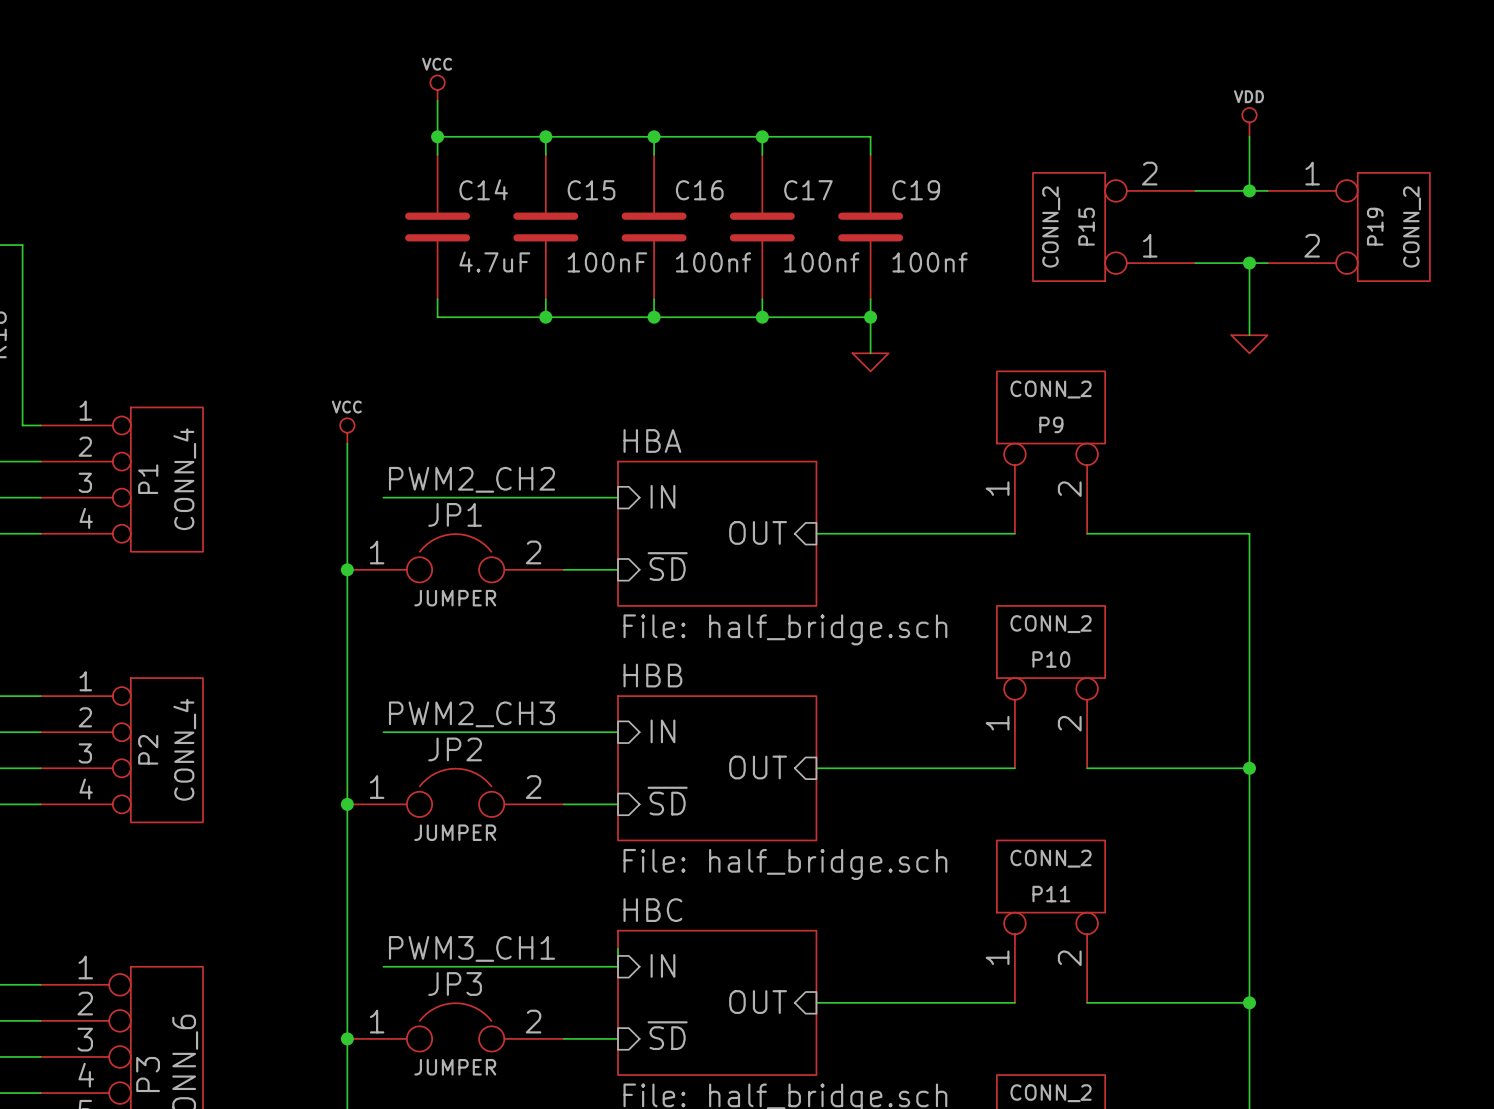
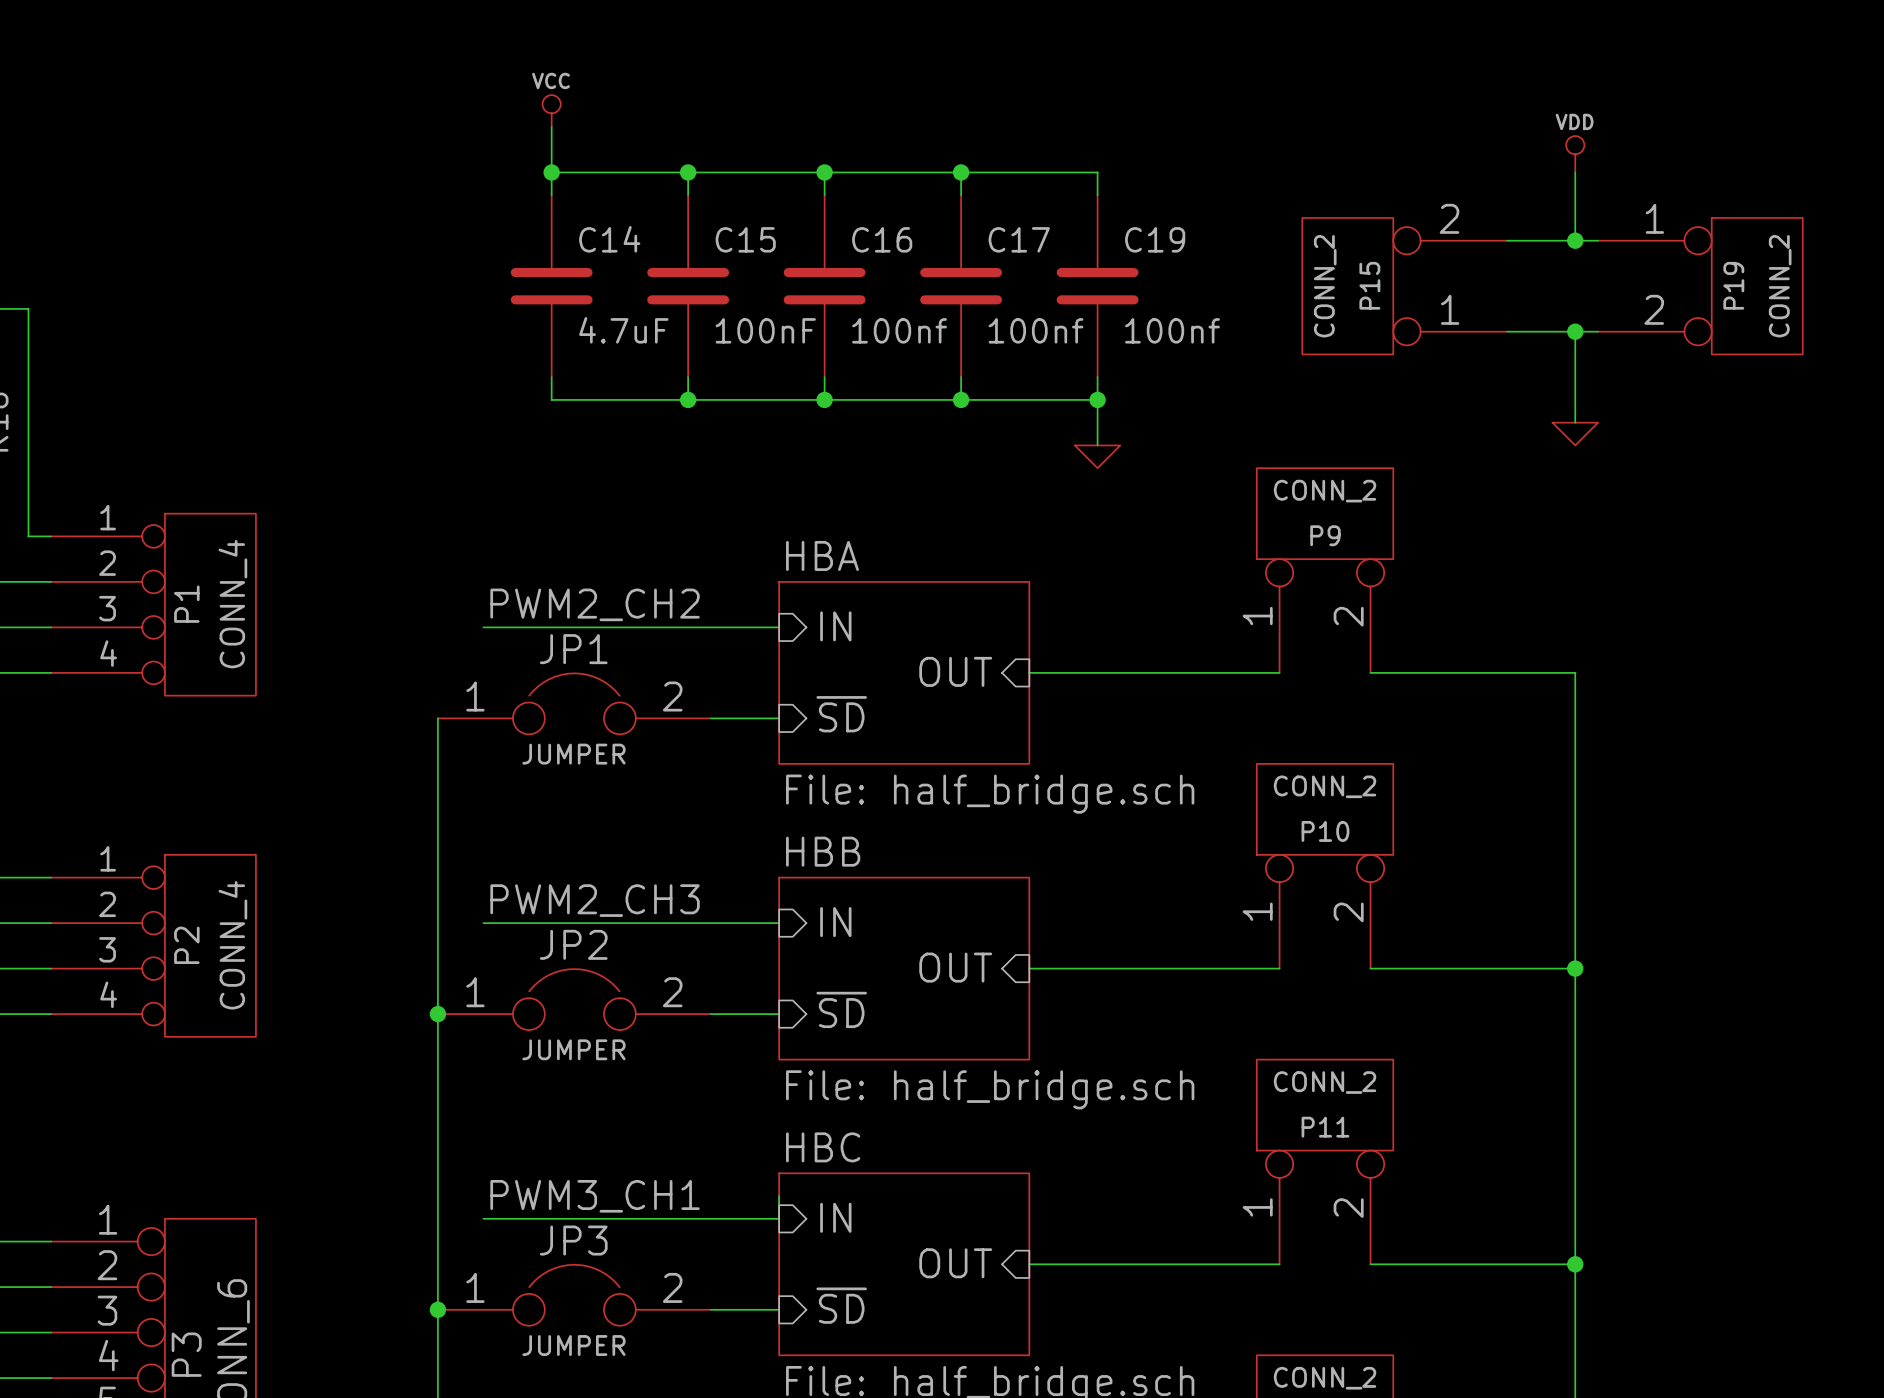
power symbol: VCC (347, 430) -> none
wire: (347, 443) (347, 569) -> none
junction: (347, 569) -> none

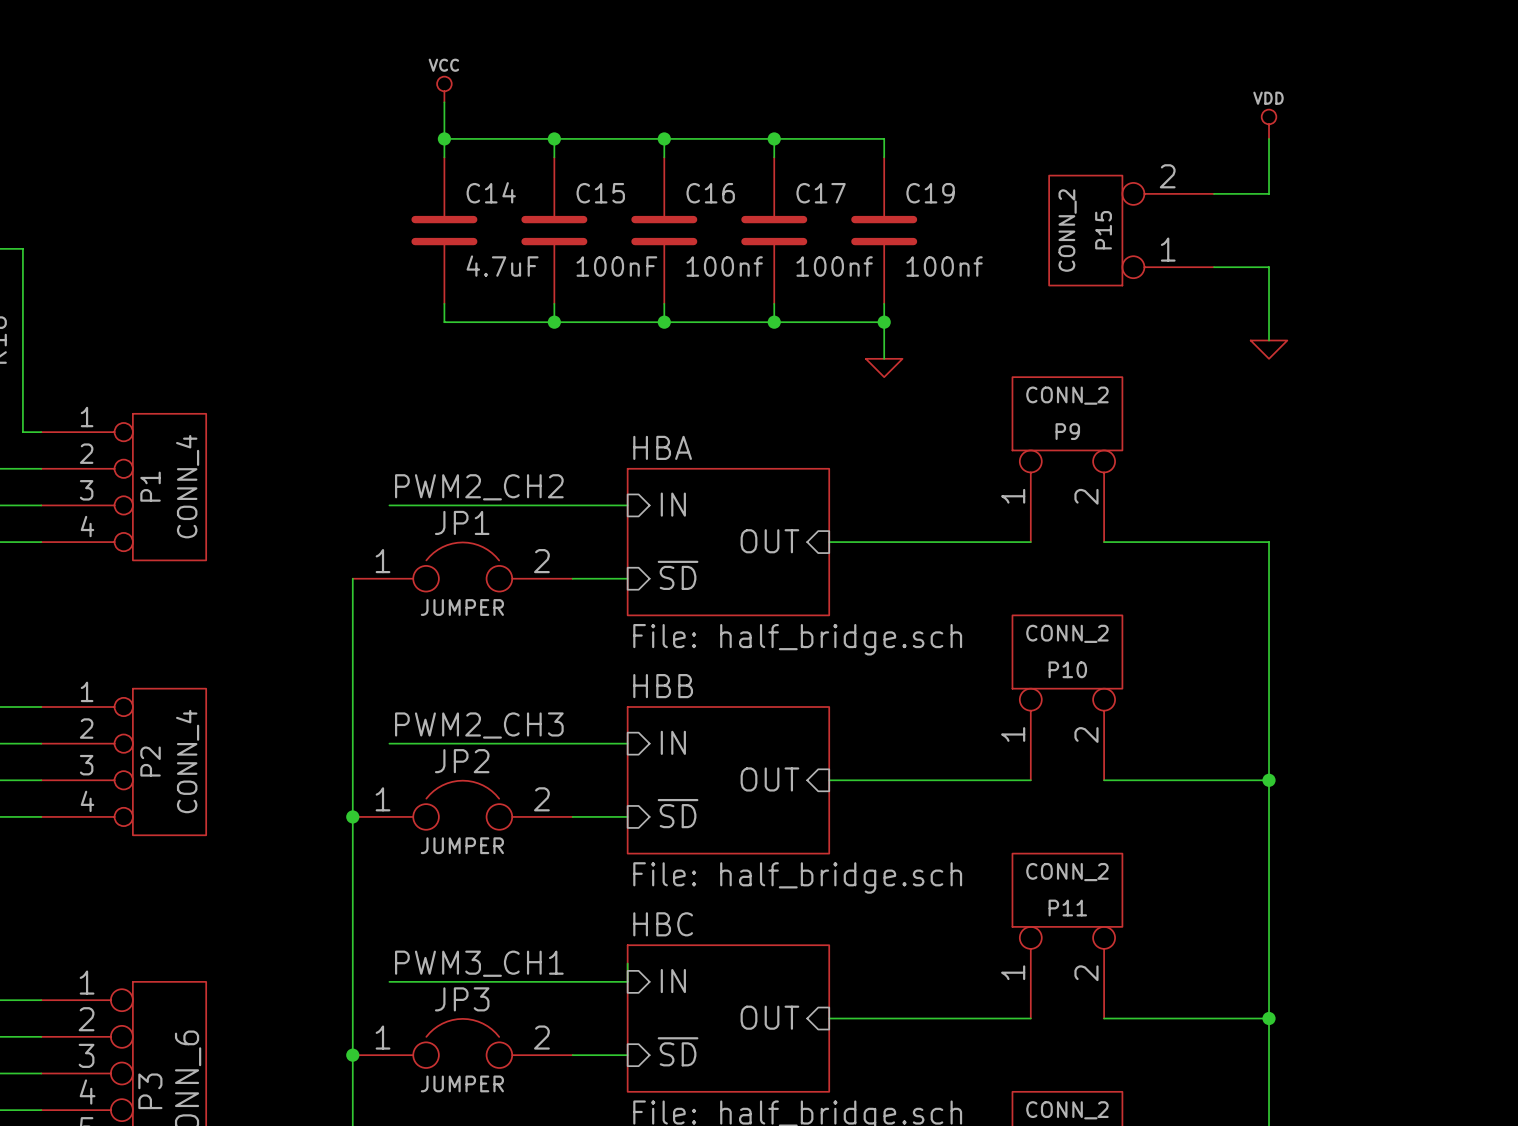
wire: (1575, 240) (1598, 240) -> none
junction: (1575, 240) -> none
P19: CONN_2 (1700, 286) -> none
wire: (1575, 331) (1598, 331) -> none
junction: (1575, 331) -> none

